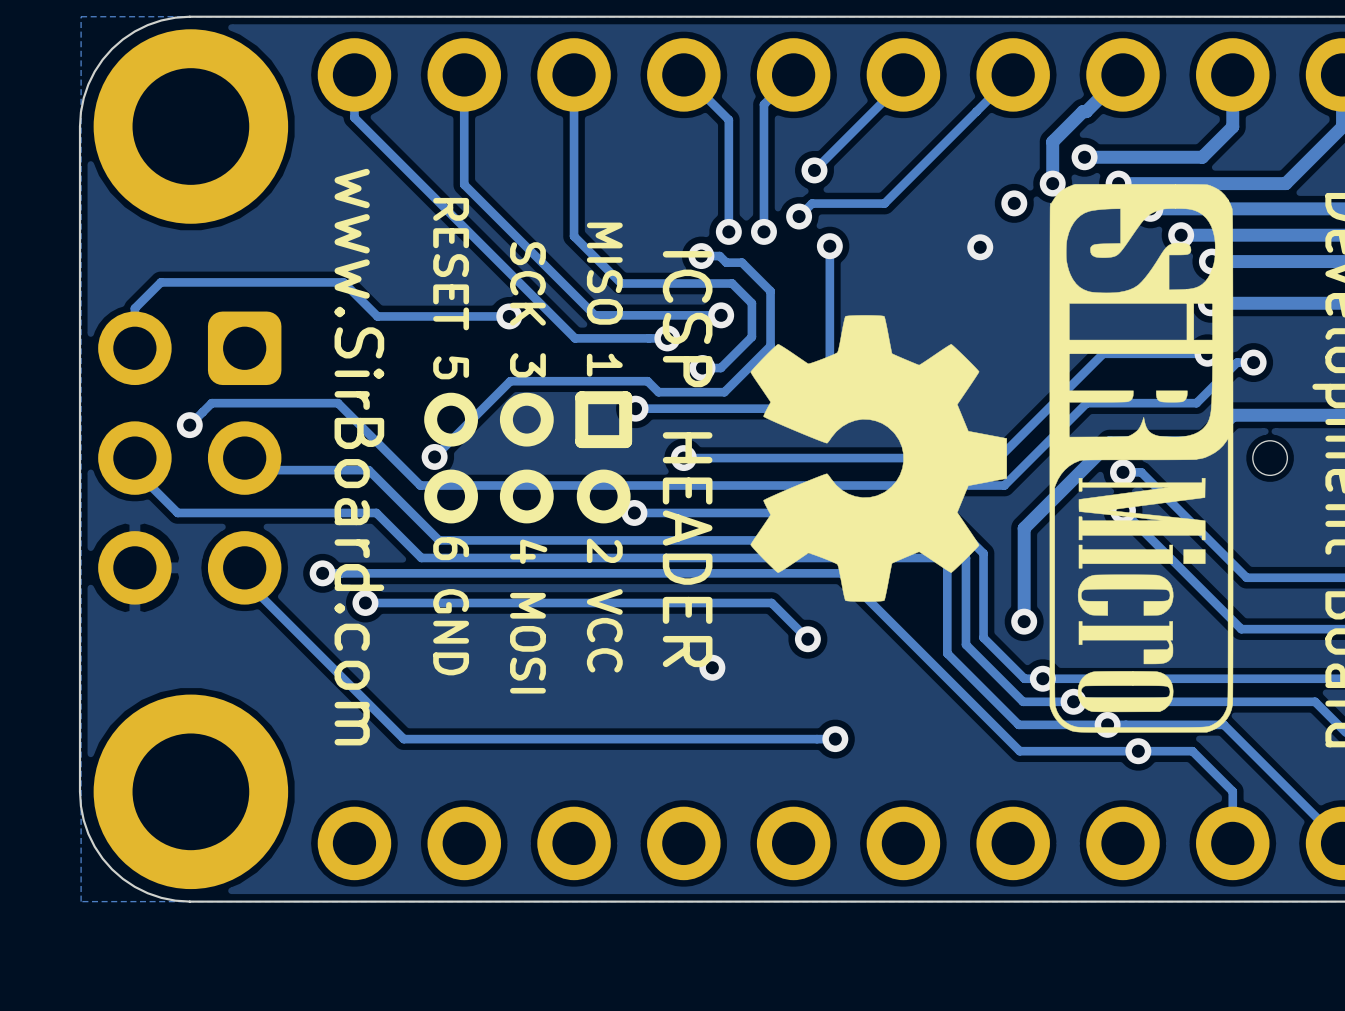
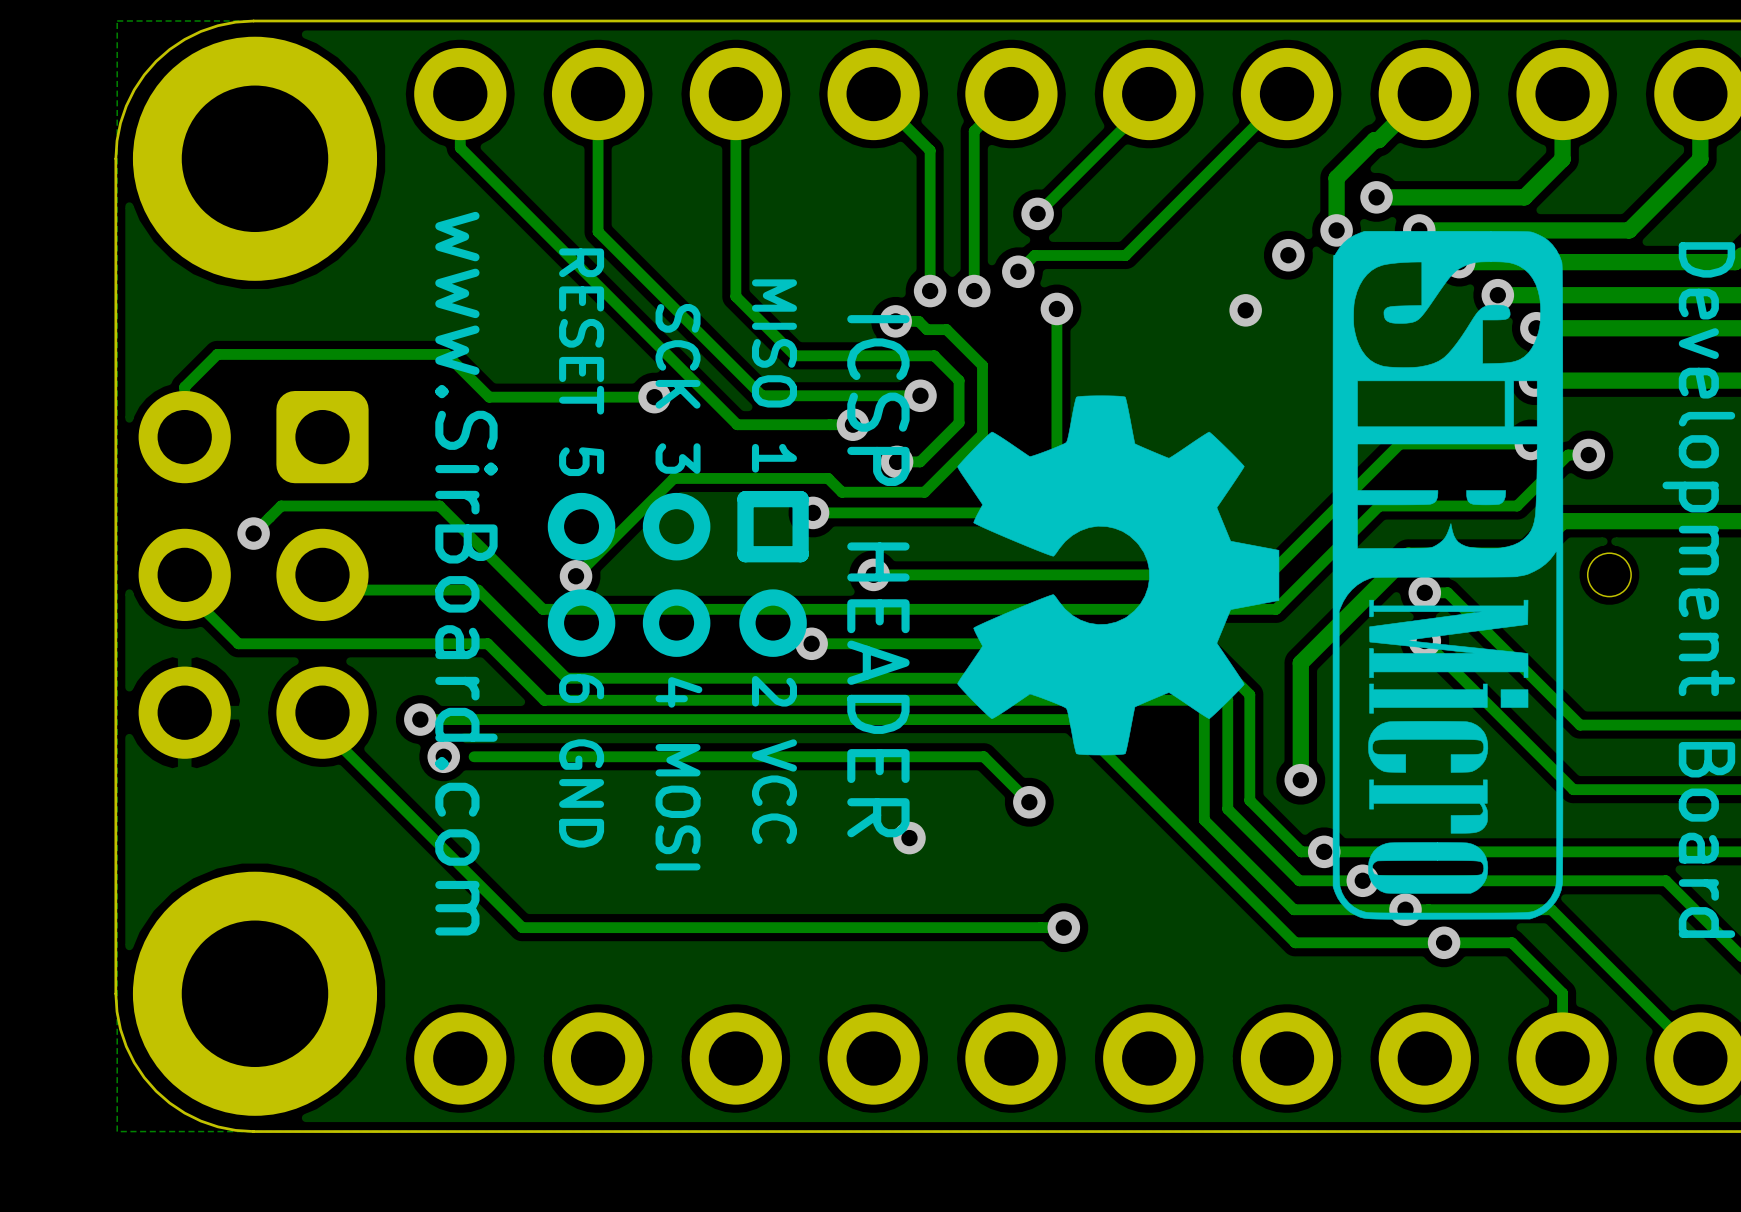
track: (524, 381) (510, 381) (434, 456) -> (673, 478) (576, 576)
via position: (434, 456) -> (576, 576)
via position: (365, 602) -> (443, 756)

